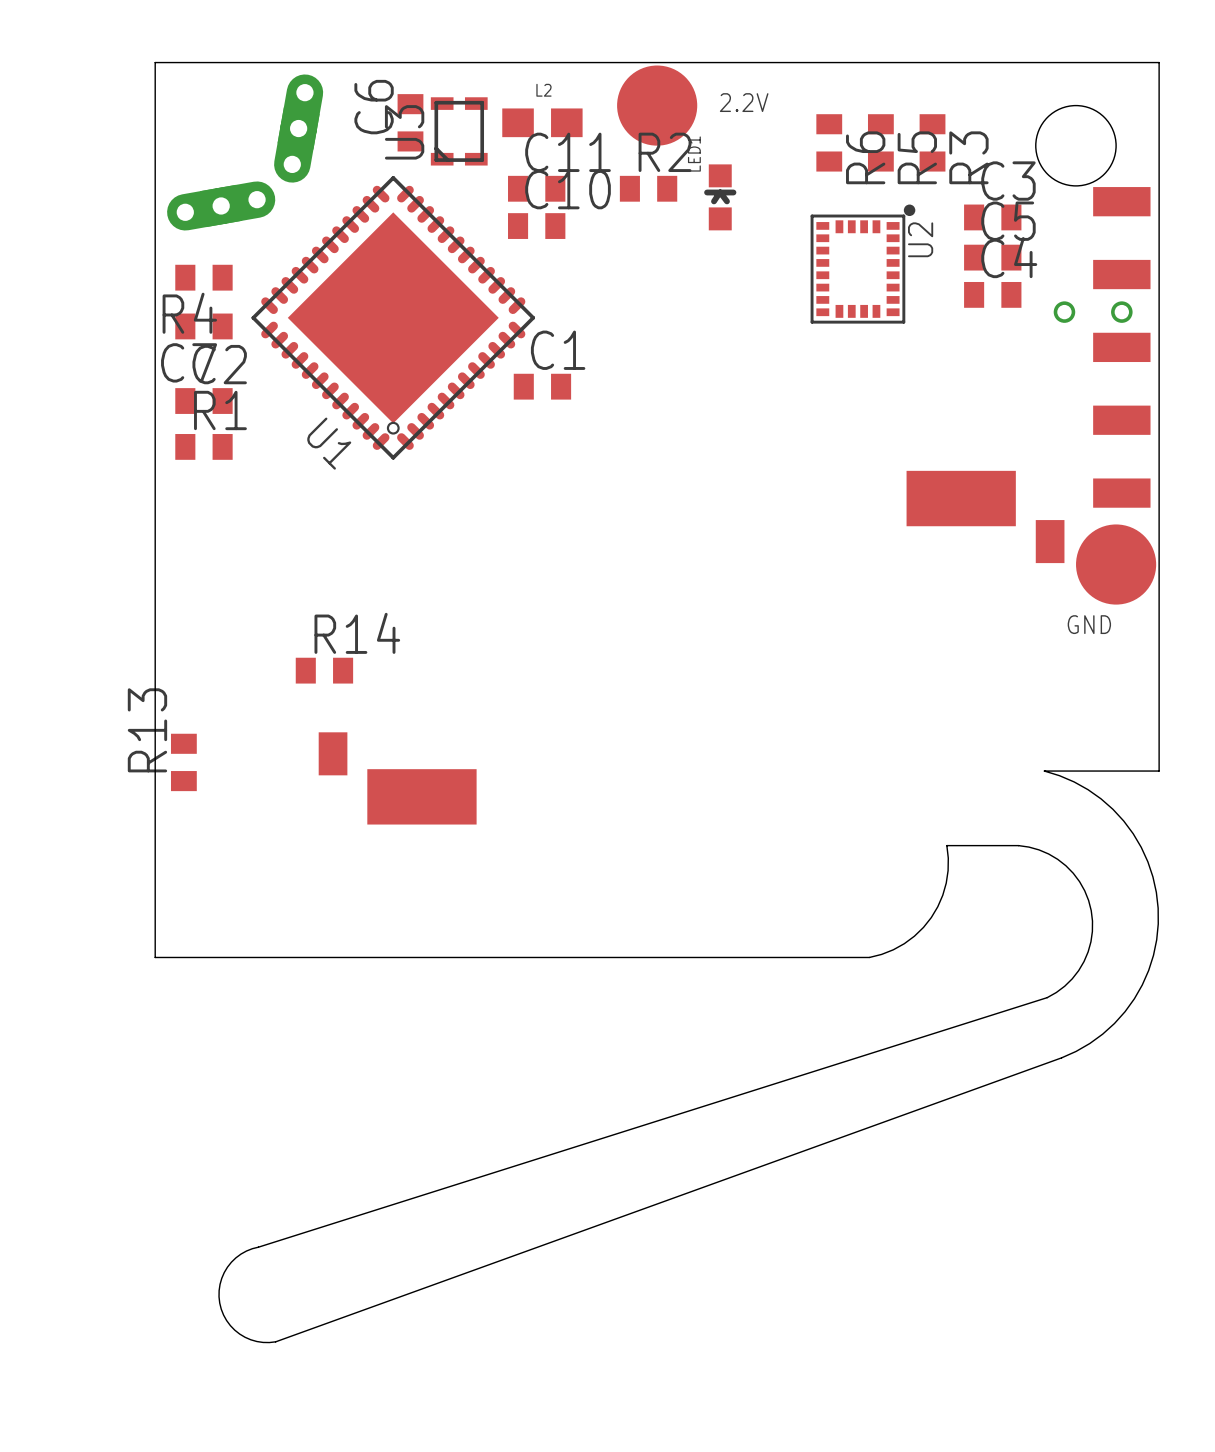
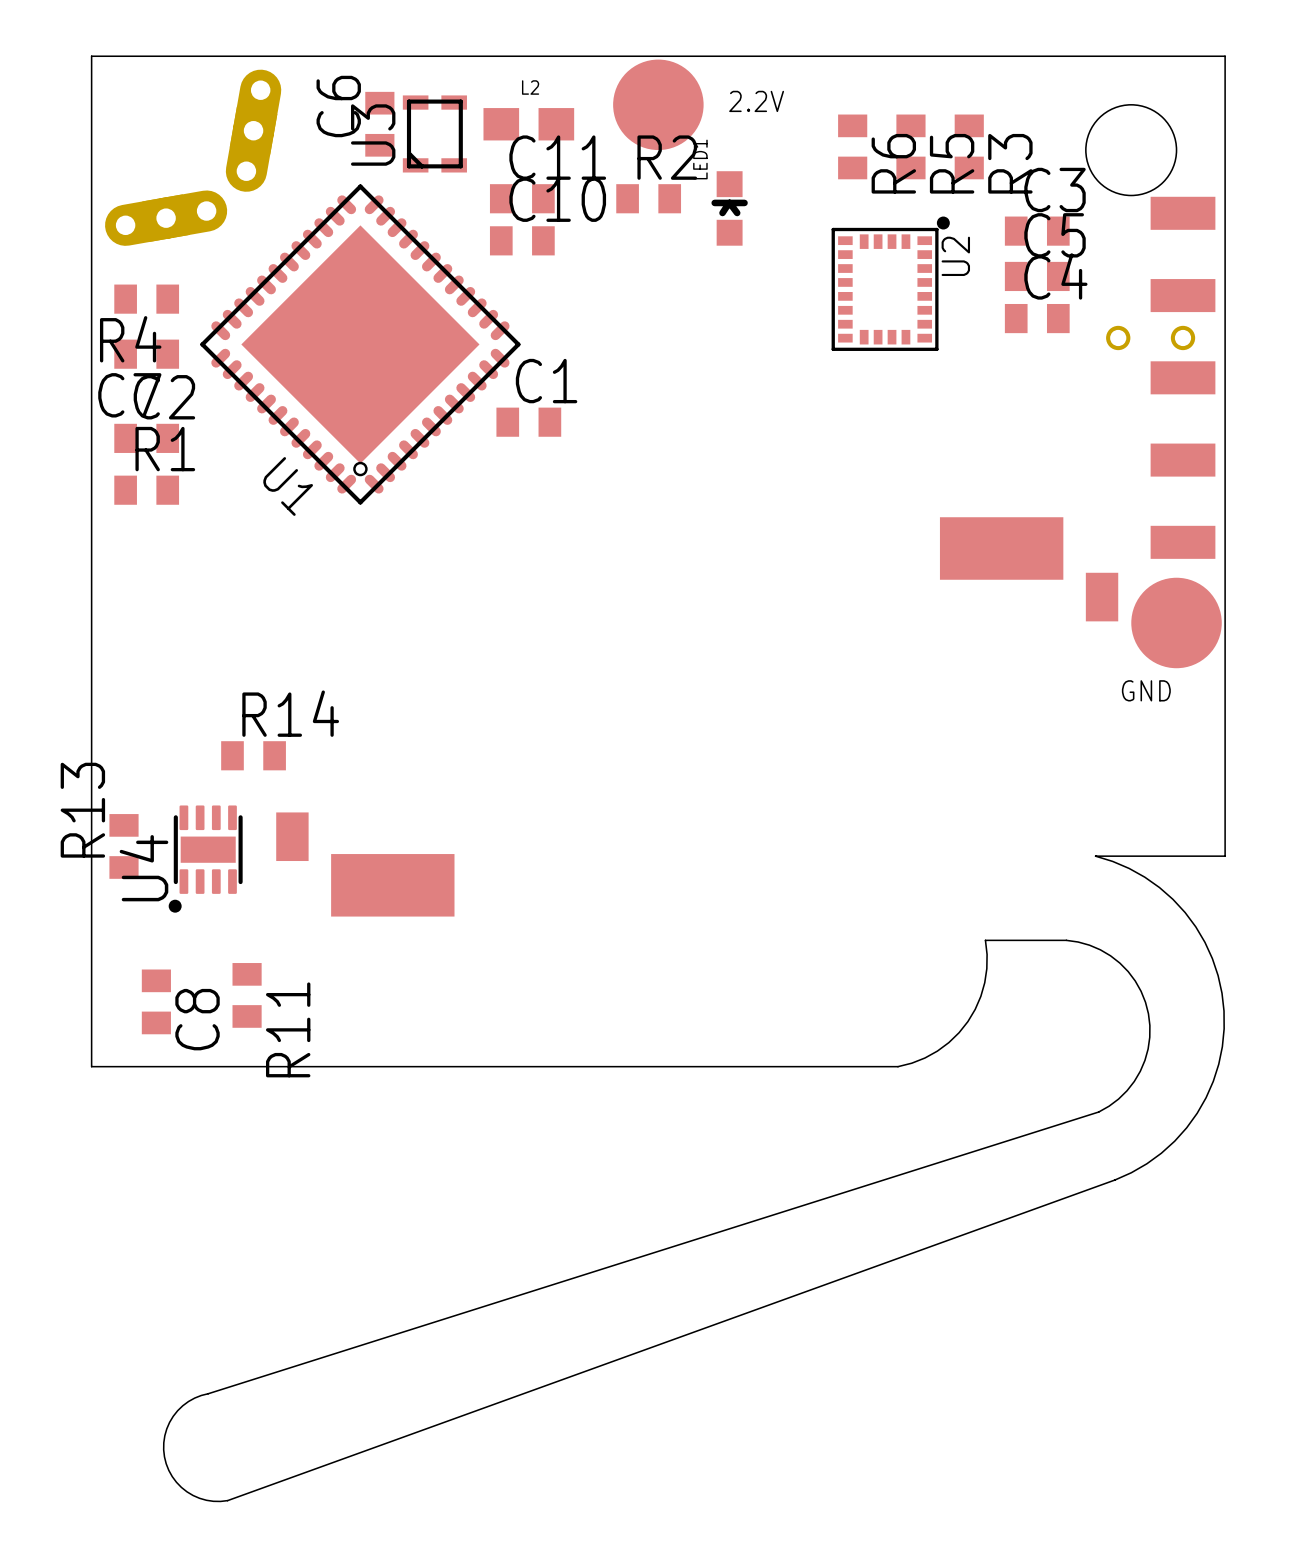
R14 position: (324, 670) -> (253, 755)
U4: none -> (205, 859)
R11: none -> (247, 995)
C8: none -> (156, 1001)

